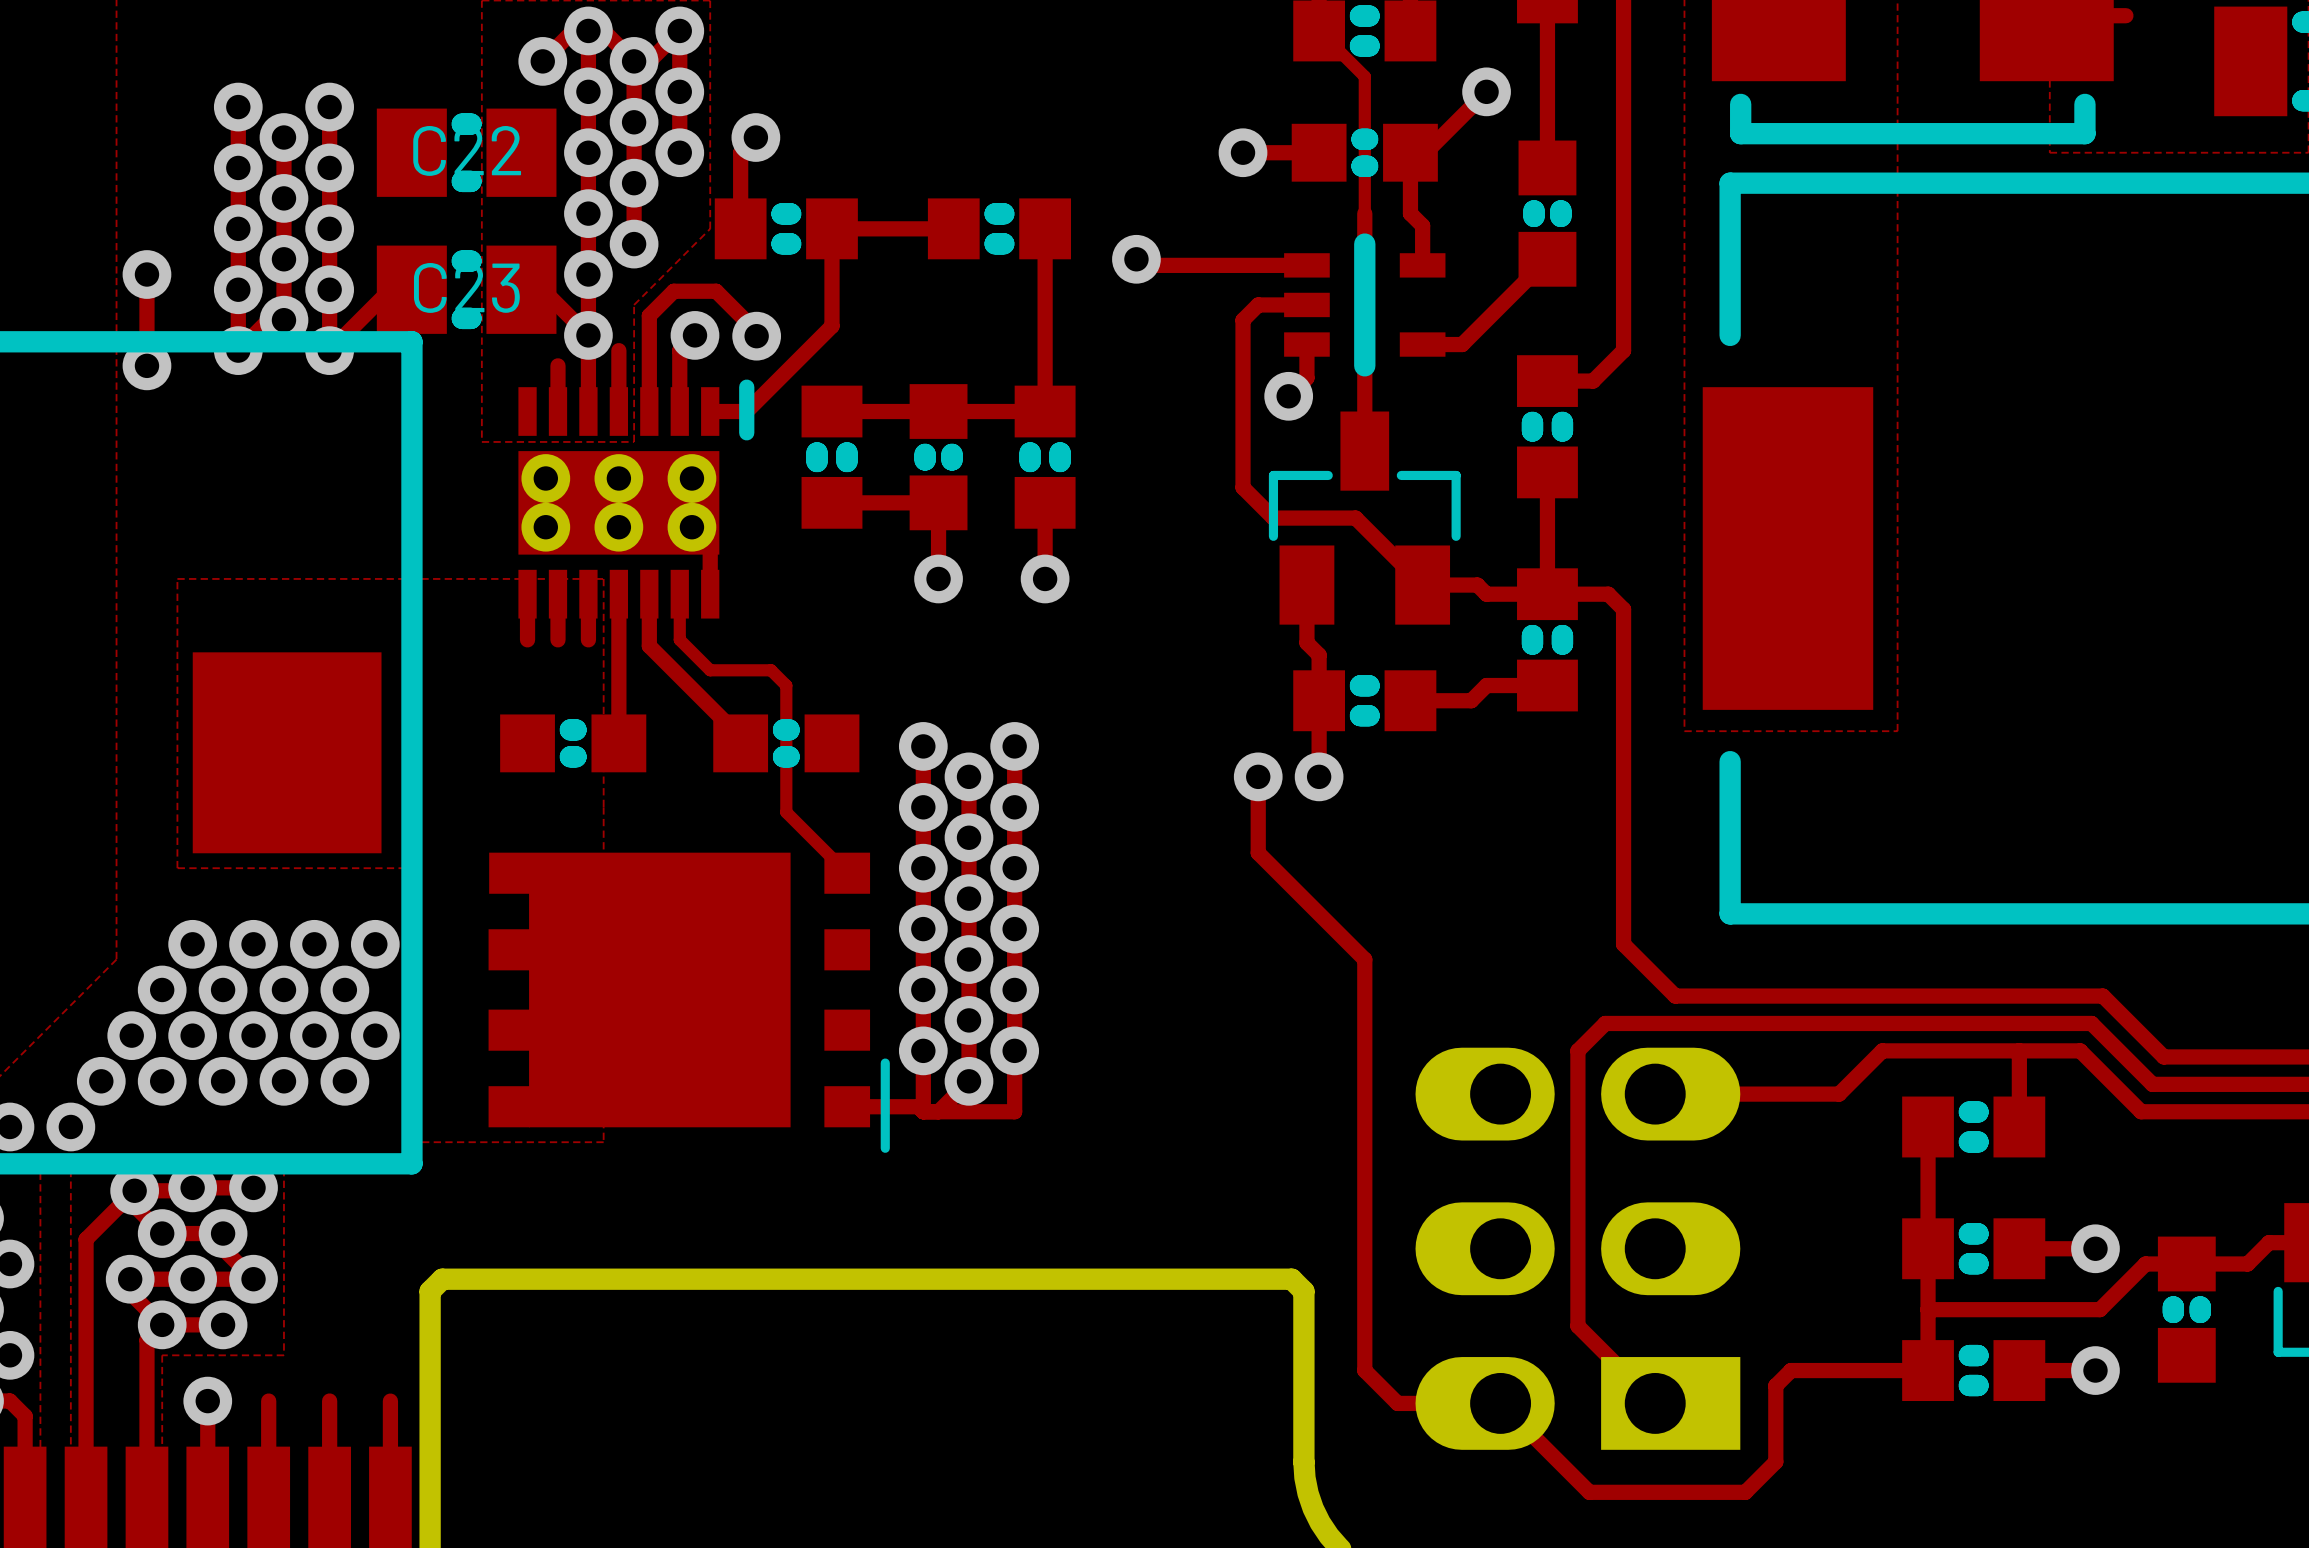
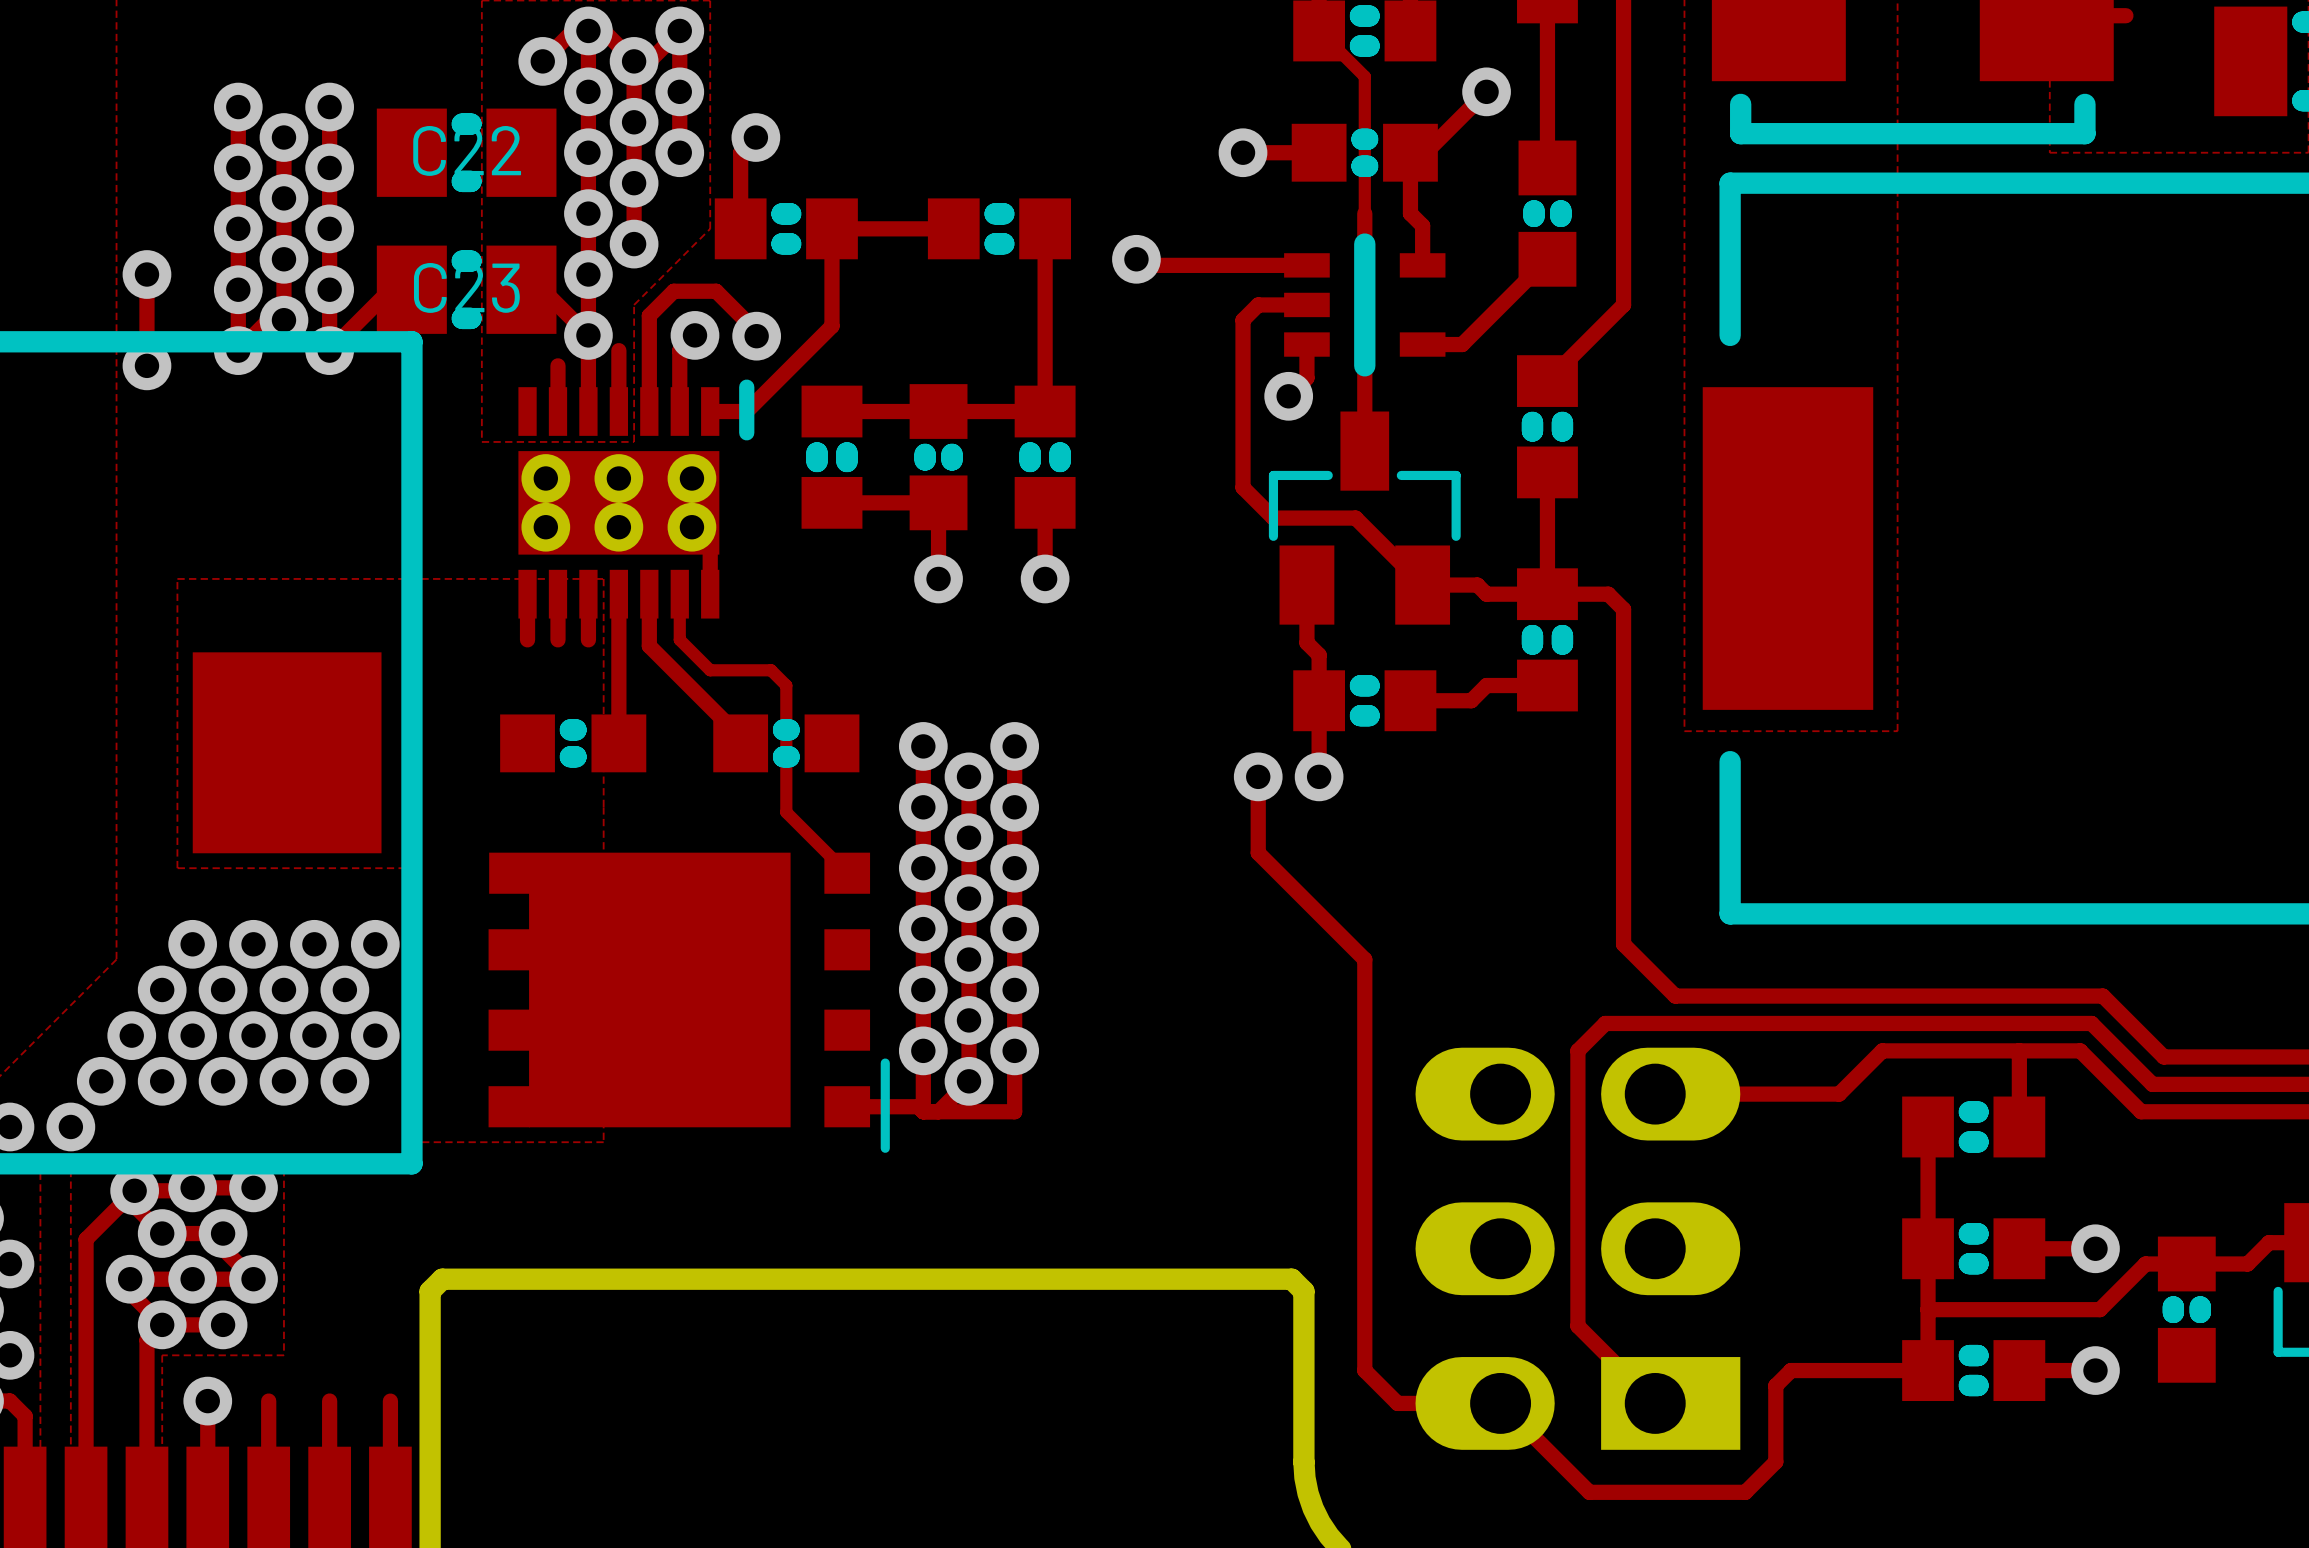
track: (1623, 304) (1623, 350) (1593, 381) (1547, 381) -> (1623, 304) (1547, 381)

